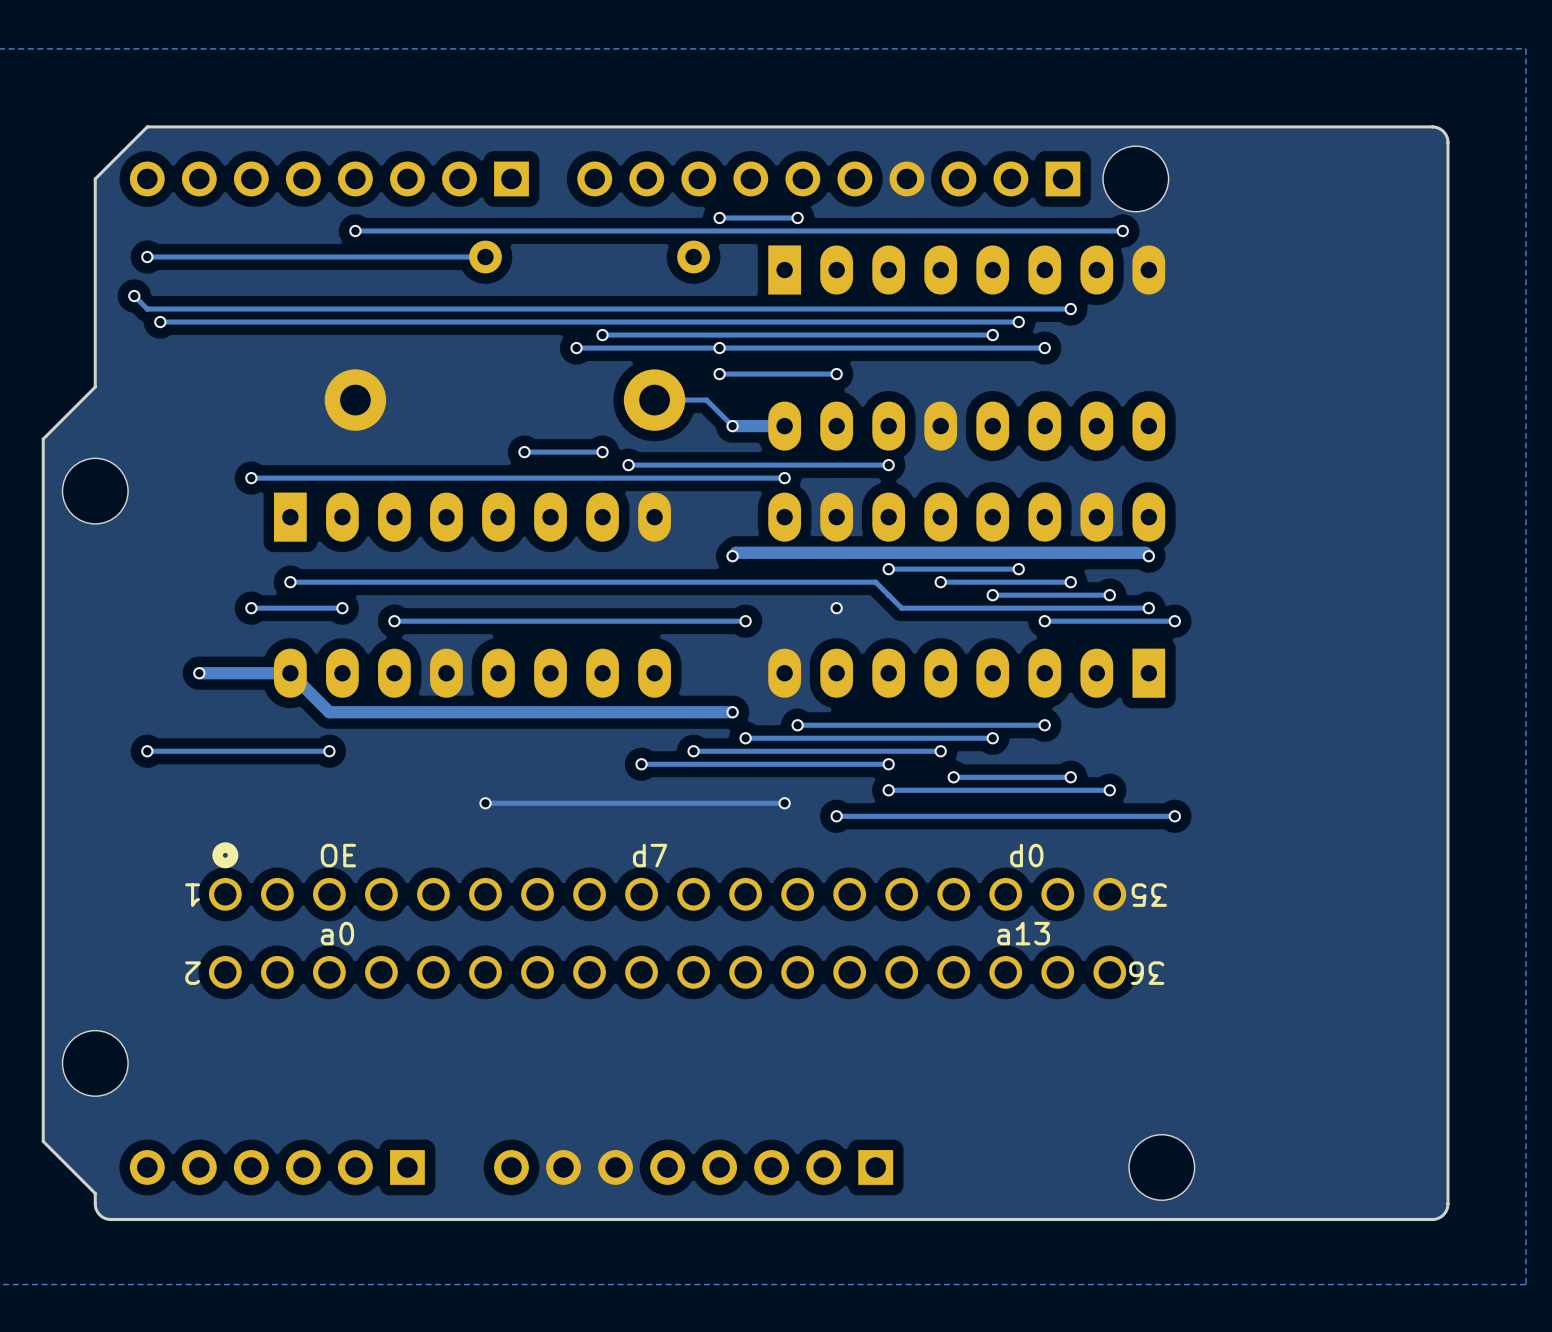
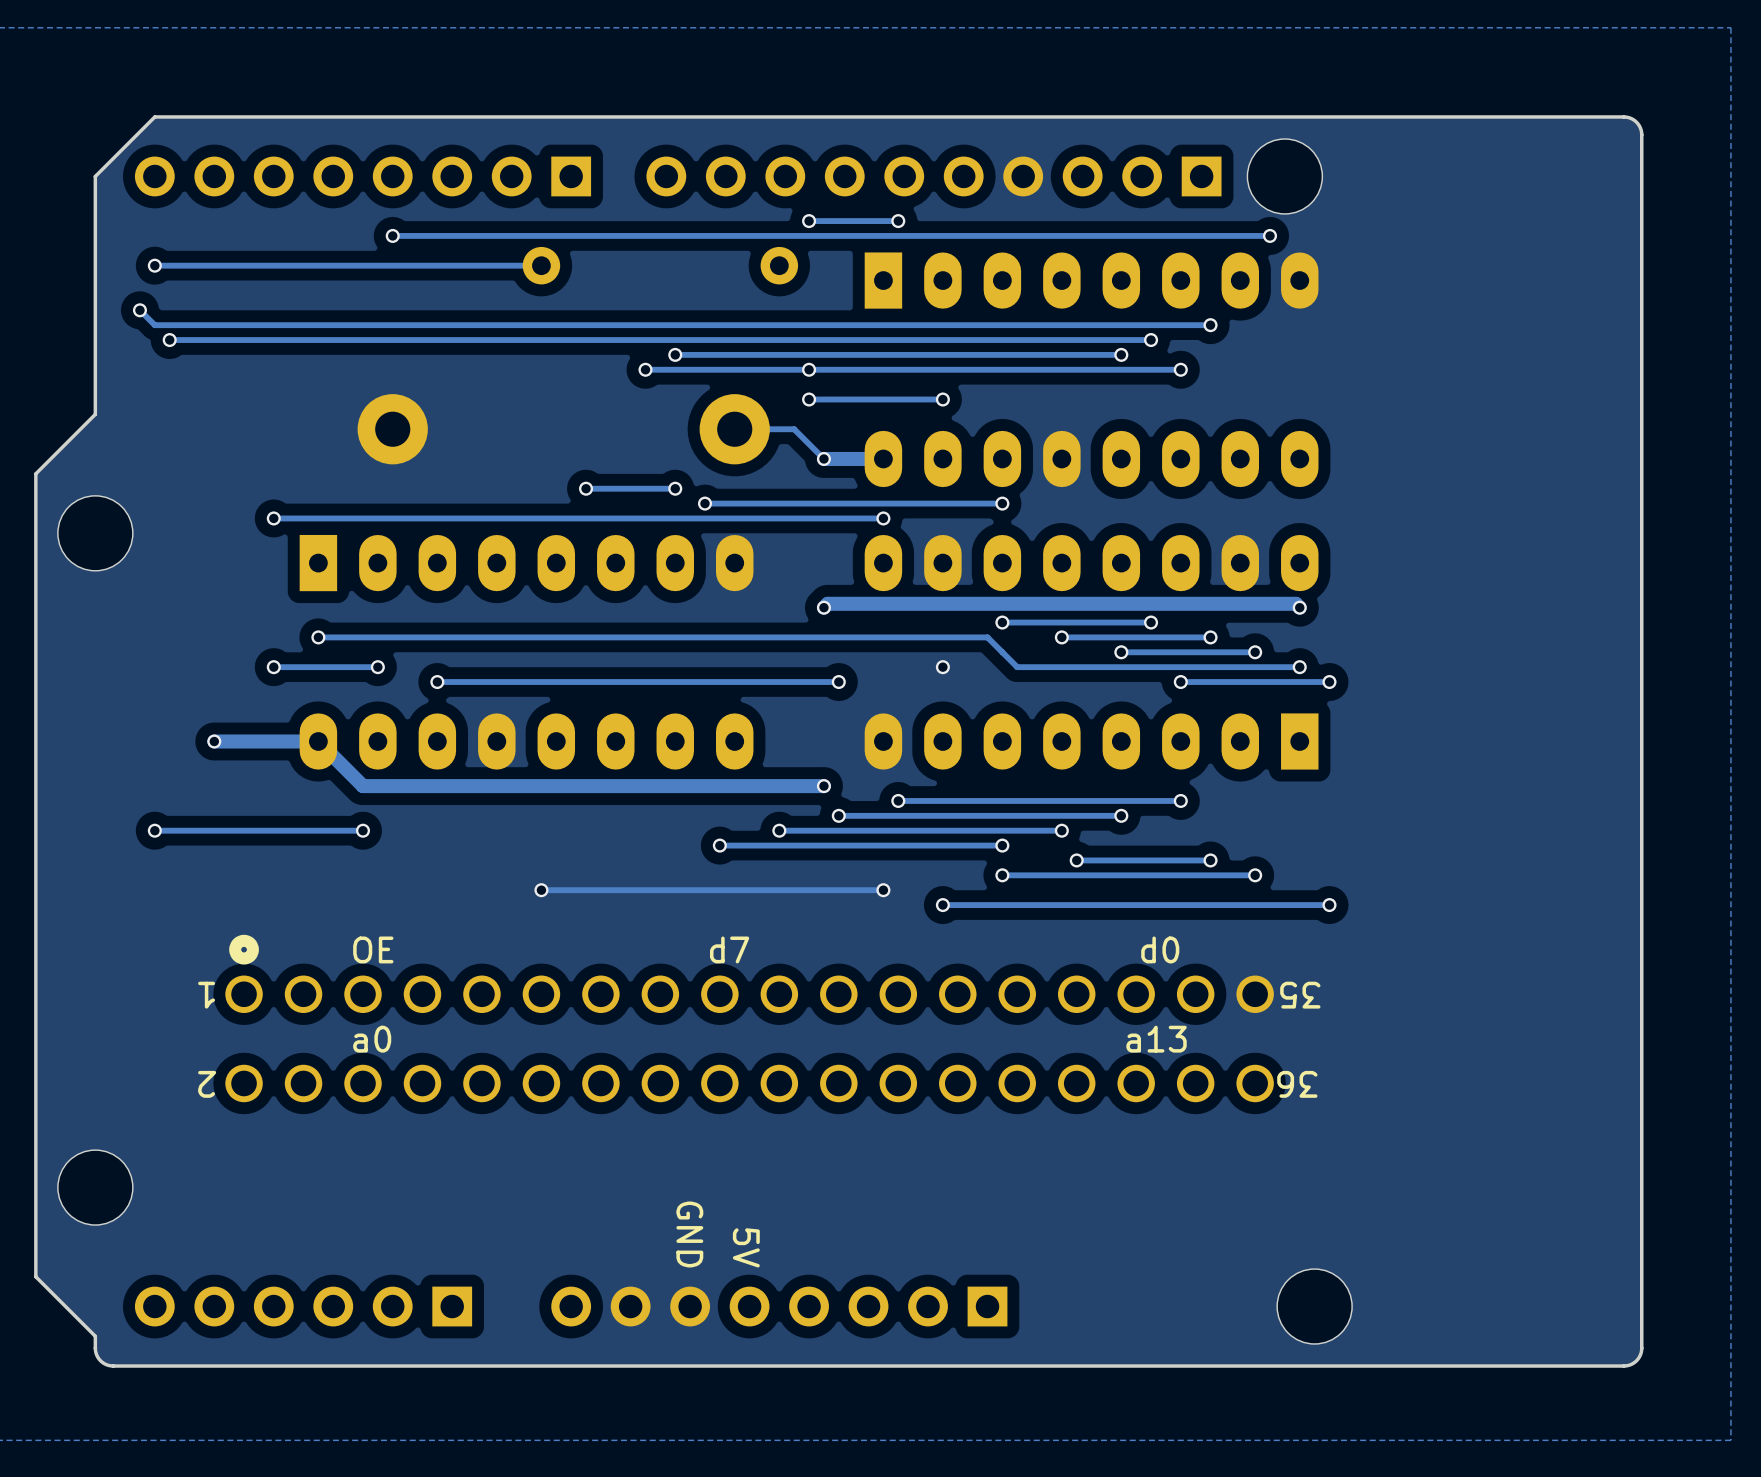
text: none -> GND (689, 1234)
text: none -> 5V (746, 1247)

